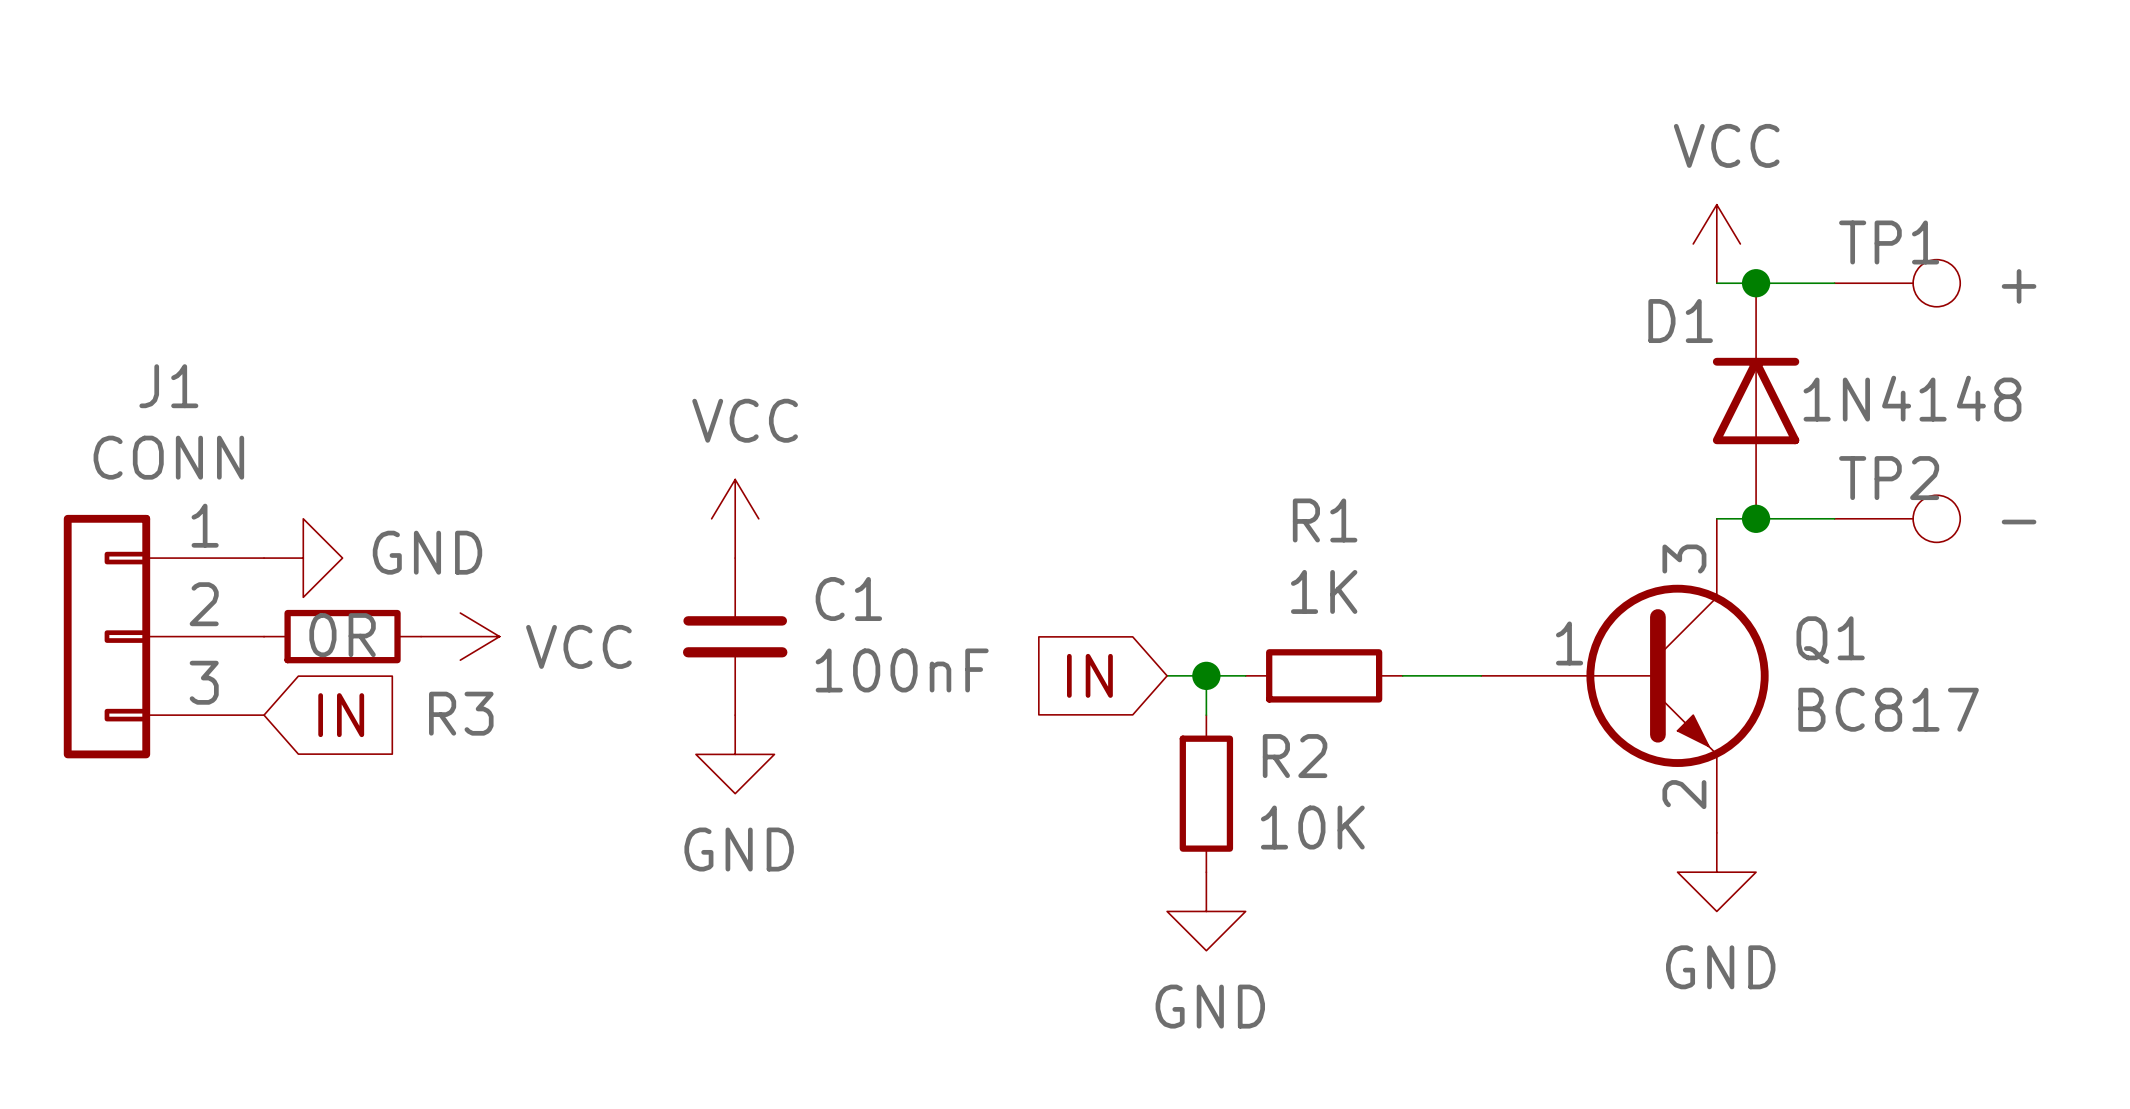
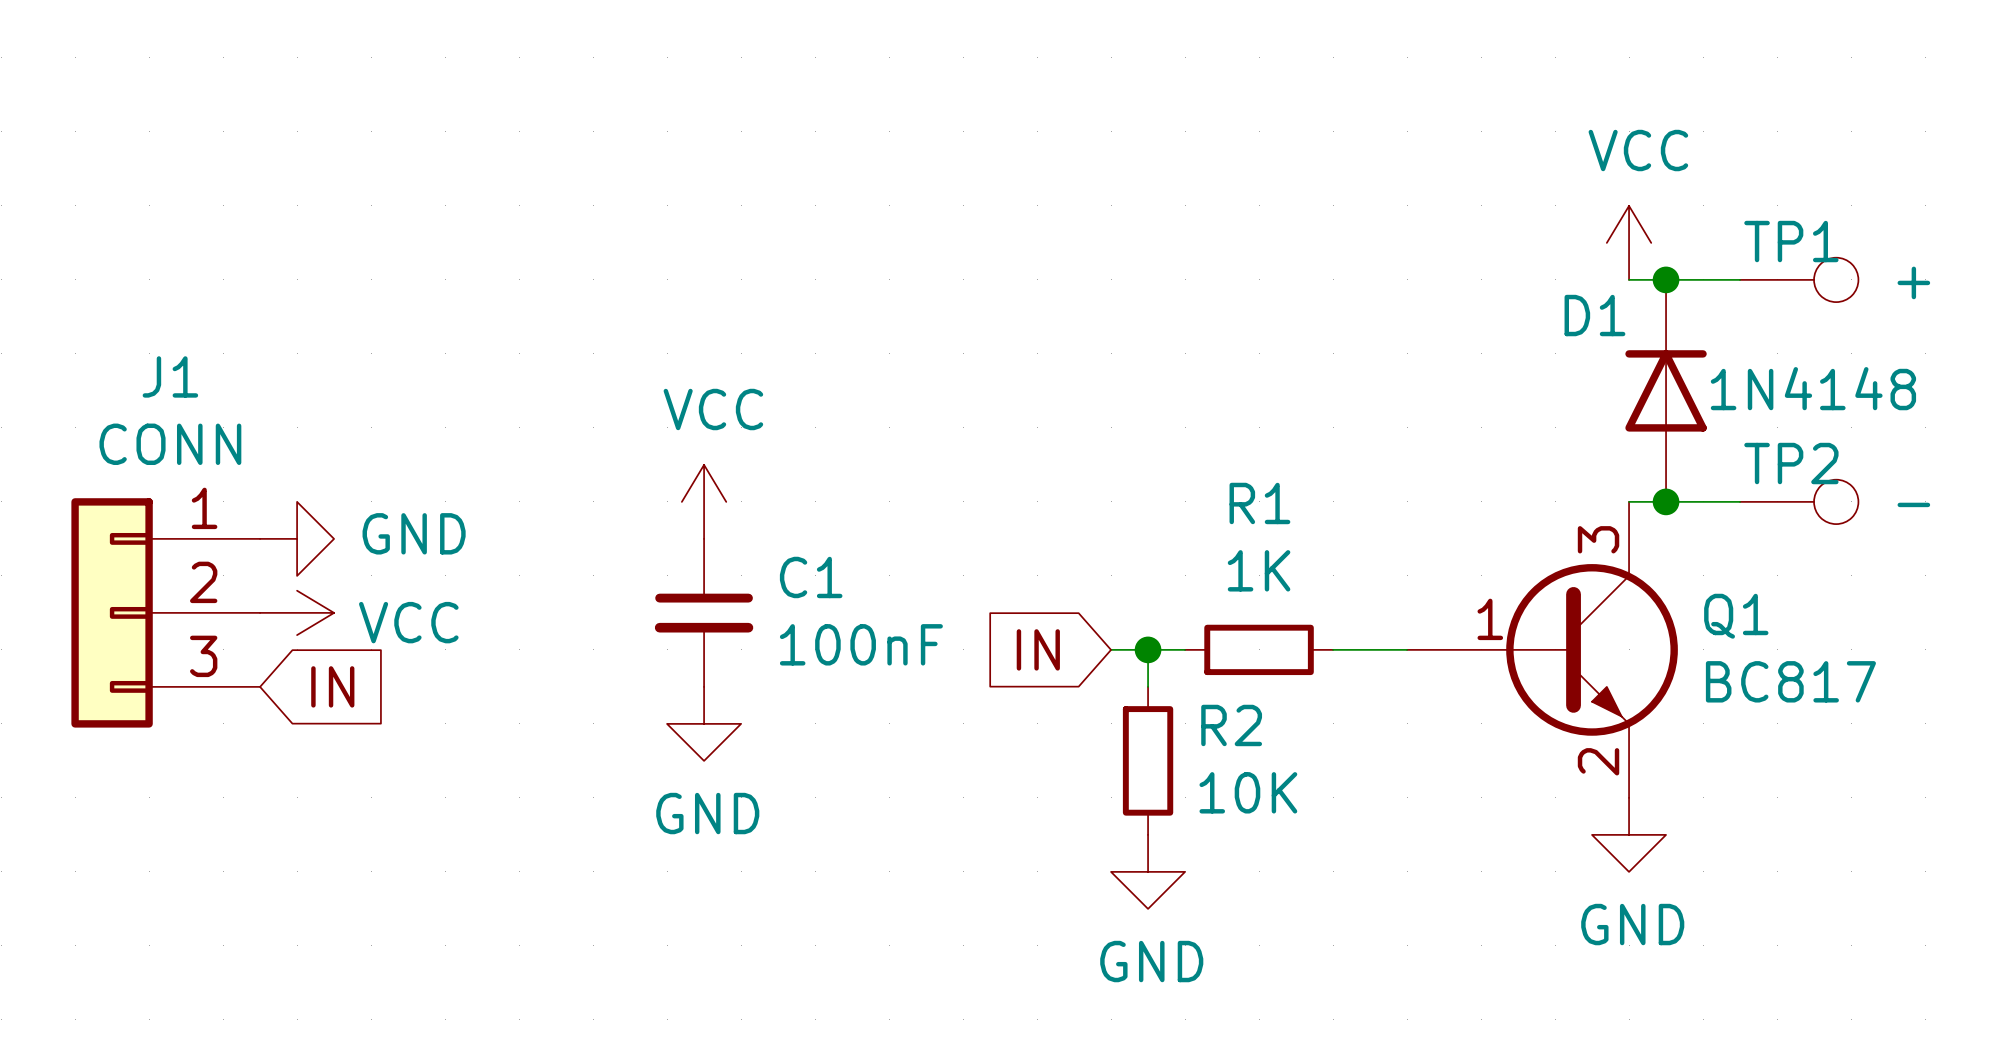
R3: 0R (342, 636) -> none
power symbol position: VCC (460, 636) -> VCC (297, 612)

